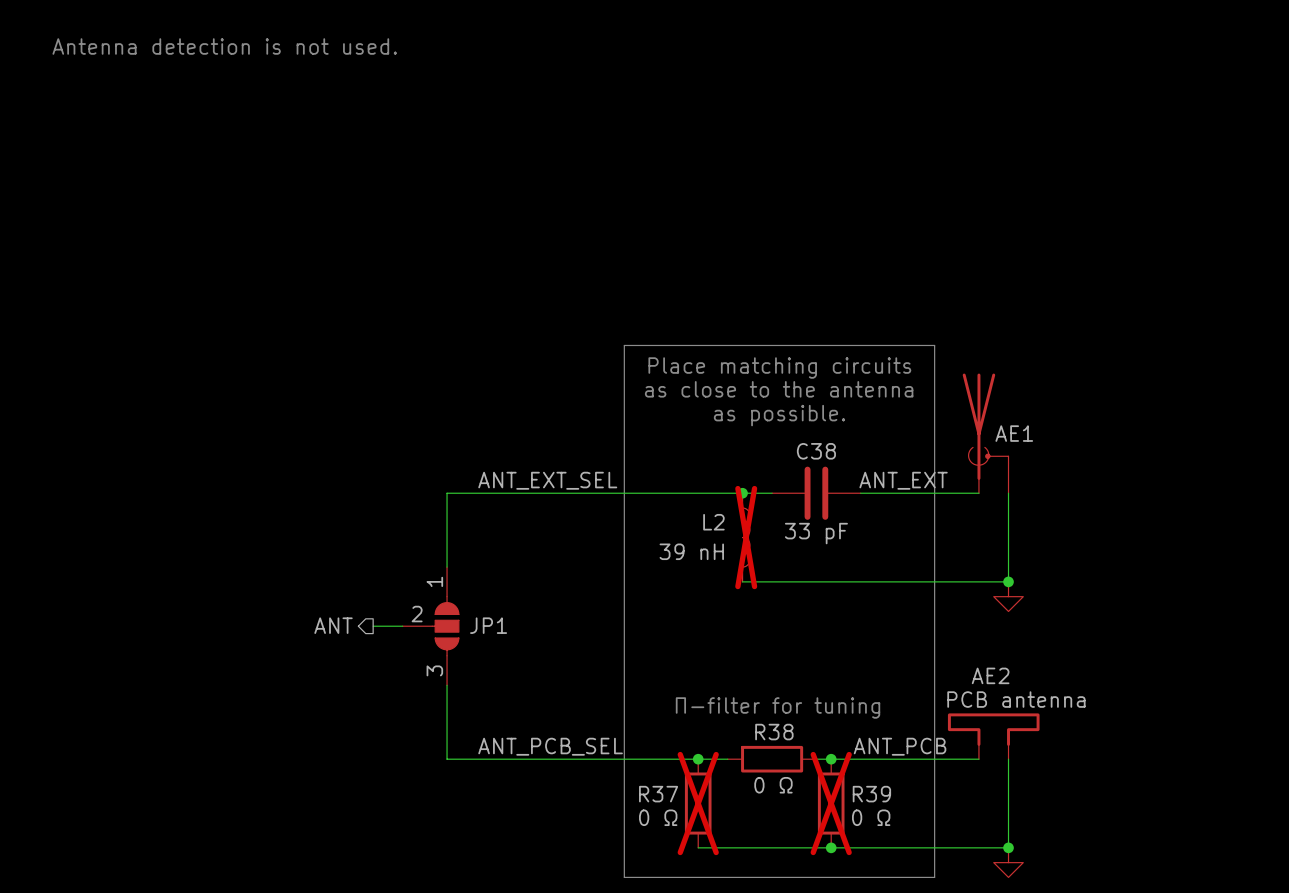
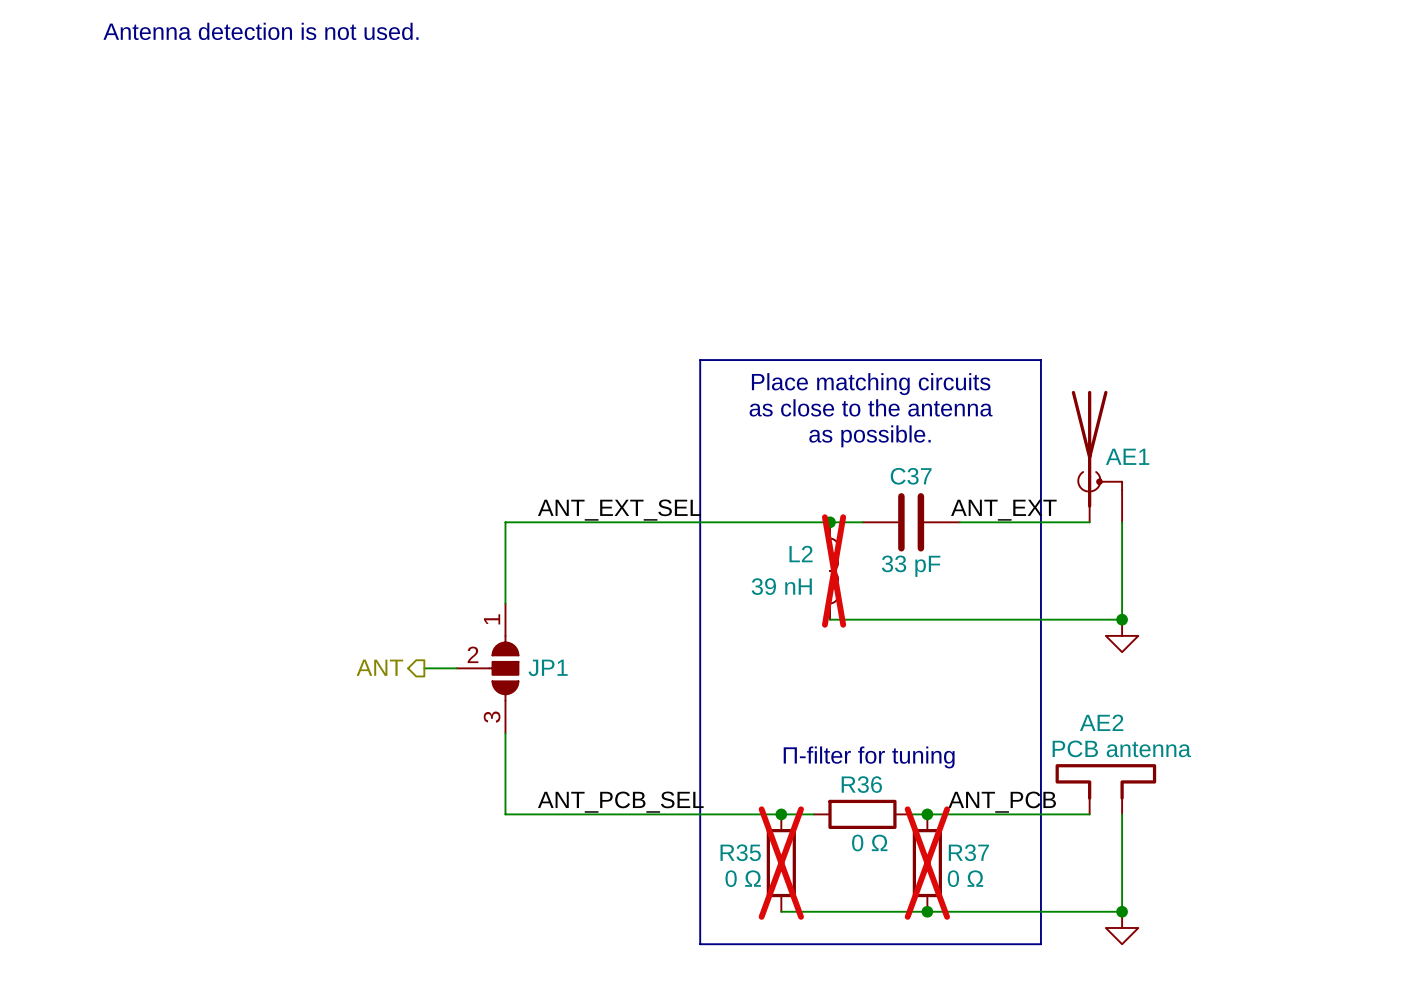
C38 name: C38 (816, 451) -> C37 (911, 476)
R38 name: R38 (774, 732) -> R36 (861, 784)
R37 name: R37 (658, 794) -> R35 (740, 852)
R39 name: R39 (871, 794) -> R37 (968, 852)

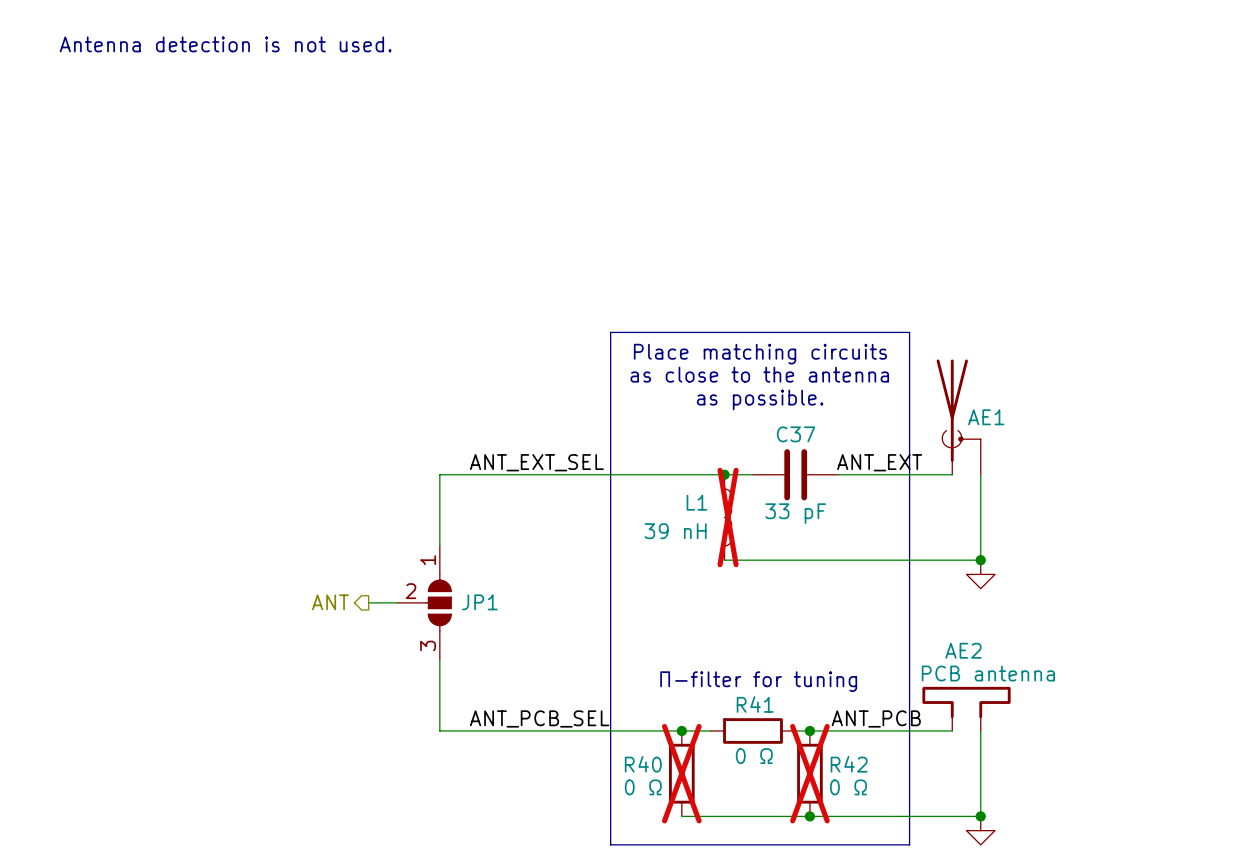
L2 name: L2 (801, 554) -> L1 (696, 502)
R36 name: R36 (861, 784) -> R41 (755, 704)
R35 name: R35 (740, 852) -> R40 (643, 764)
R37 name: R37 (968, 852) -> R42 (849, 764)

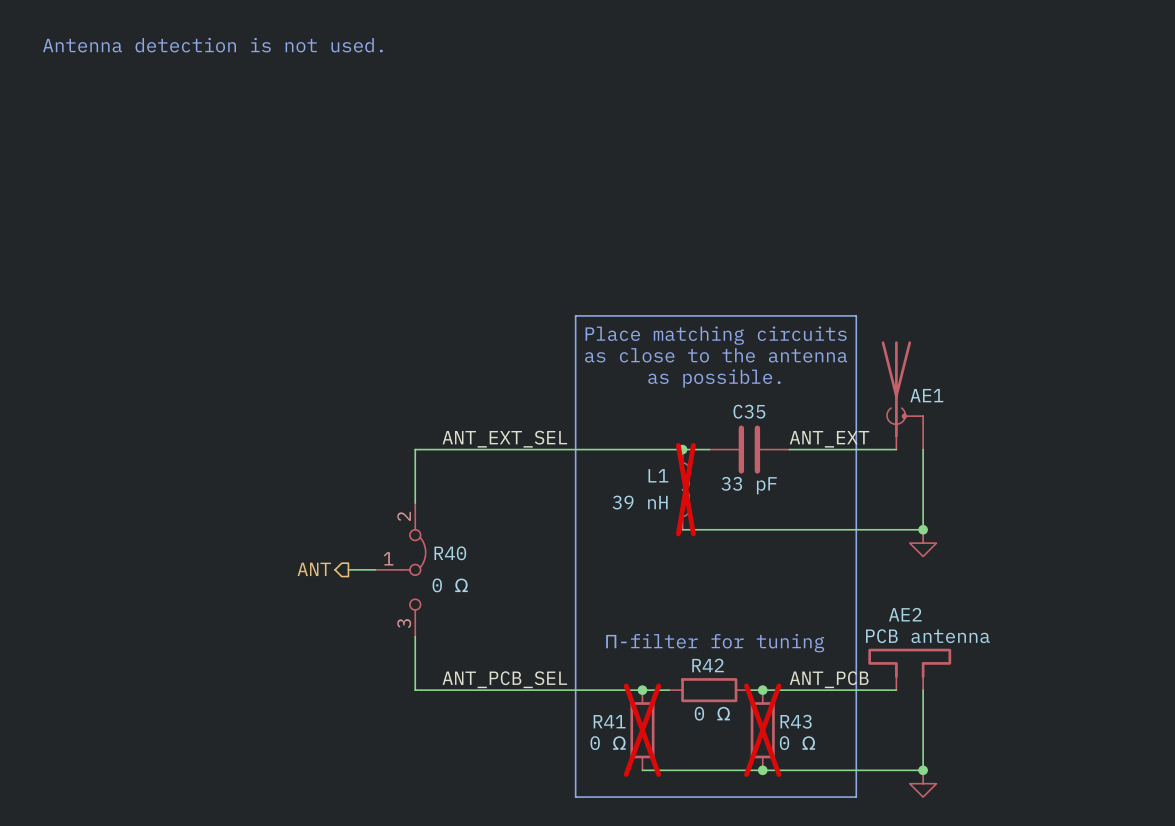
C37 name: C37 (796, 434) -> C35 (749, 411)
JP1: (424, 602) -> none
R40: none -> 0 Ω (400, 569)
R41 name: R41 (755, 704) -> R42 (708, 665)
R40 name: R40 (643, 764) -> R41 (609, 721)
R42 name: R42 (849, 764) -> R43 (796, 721)

